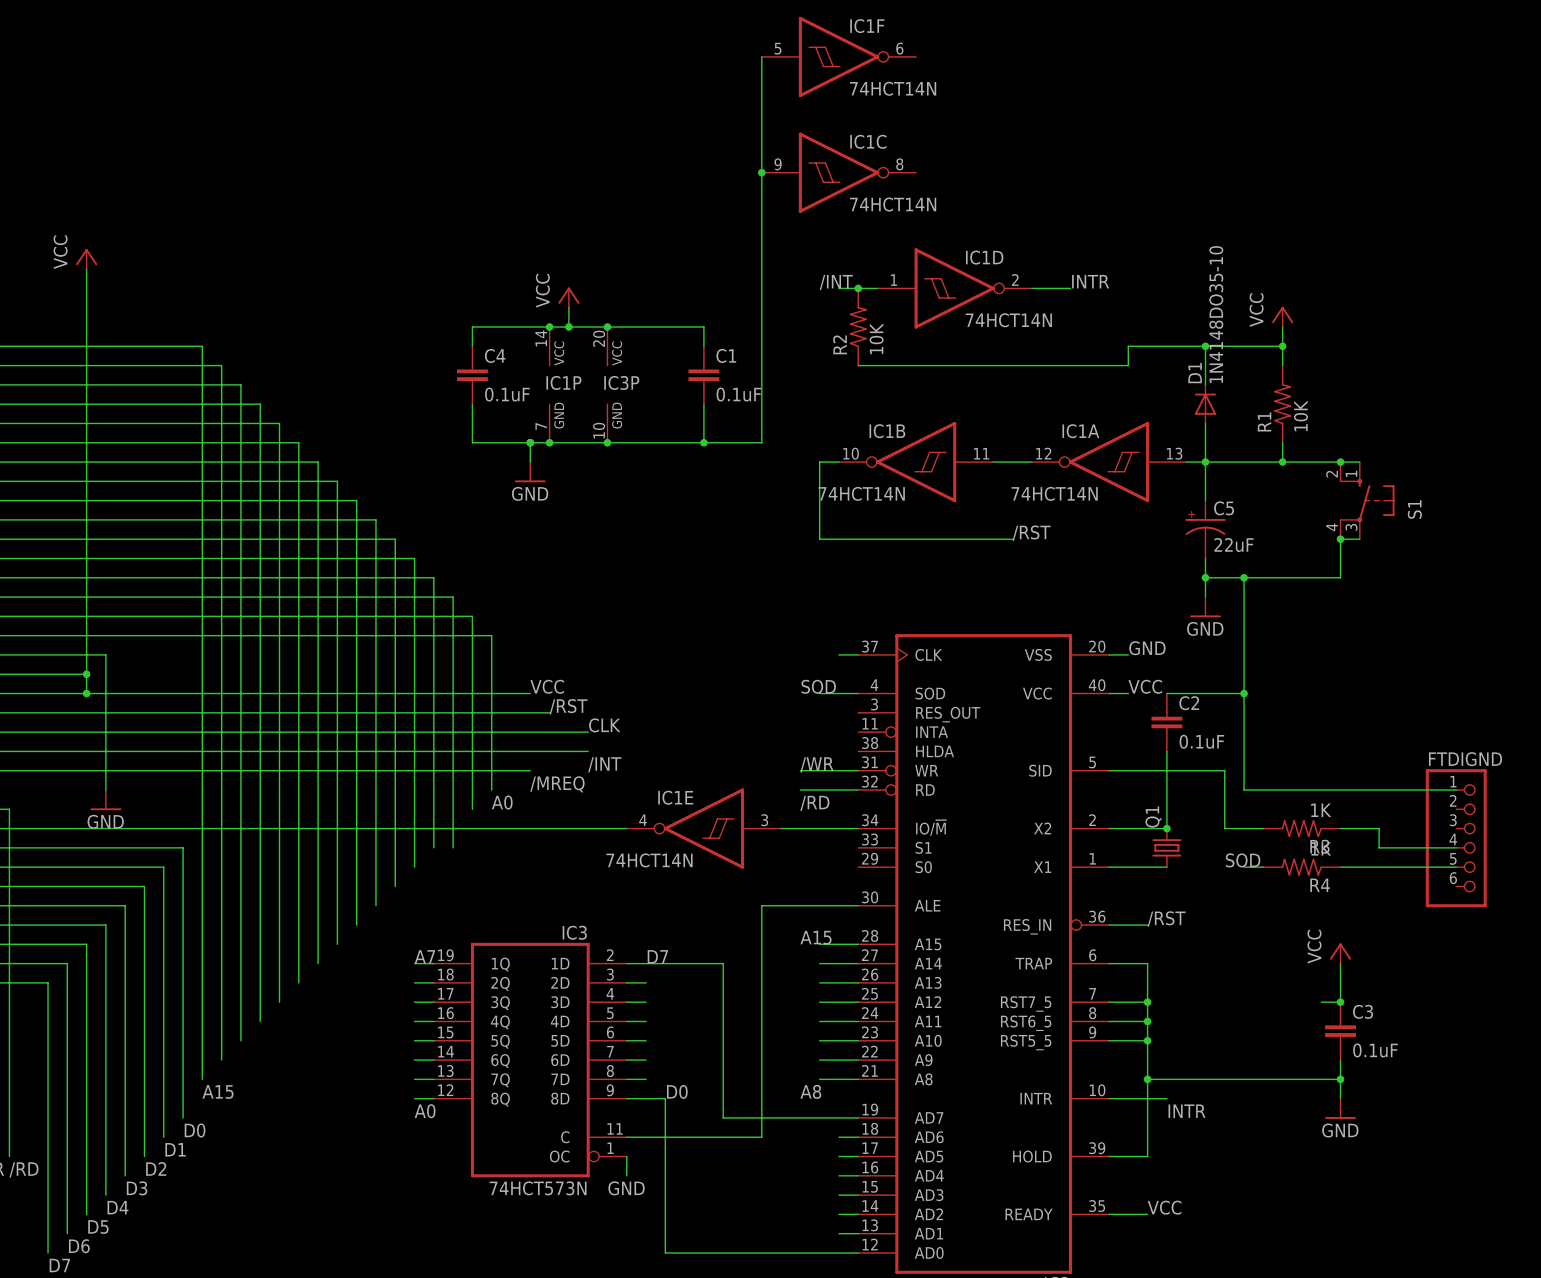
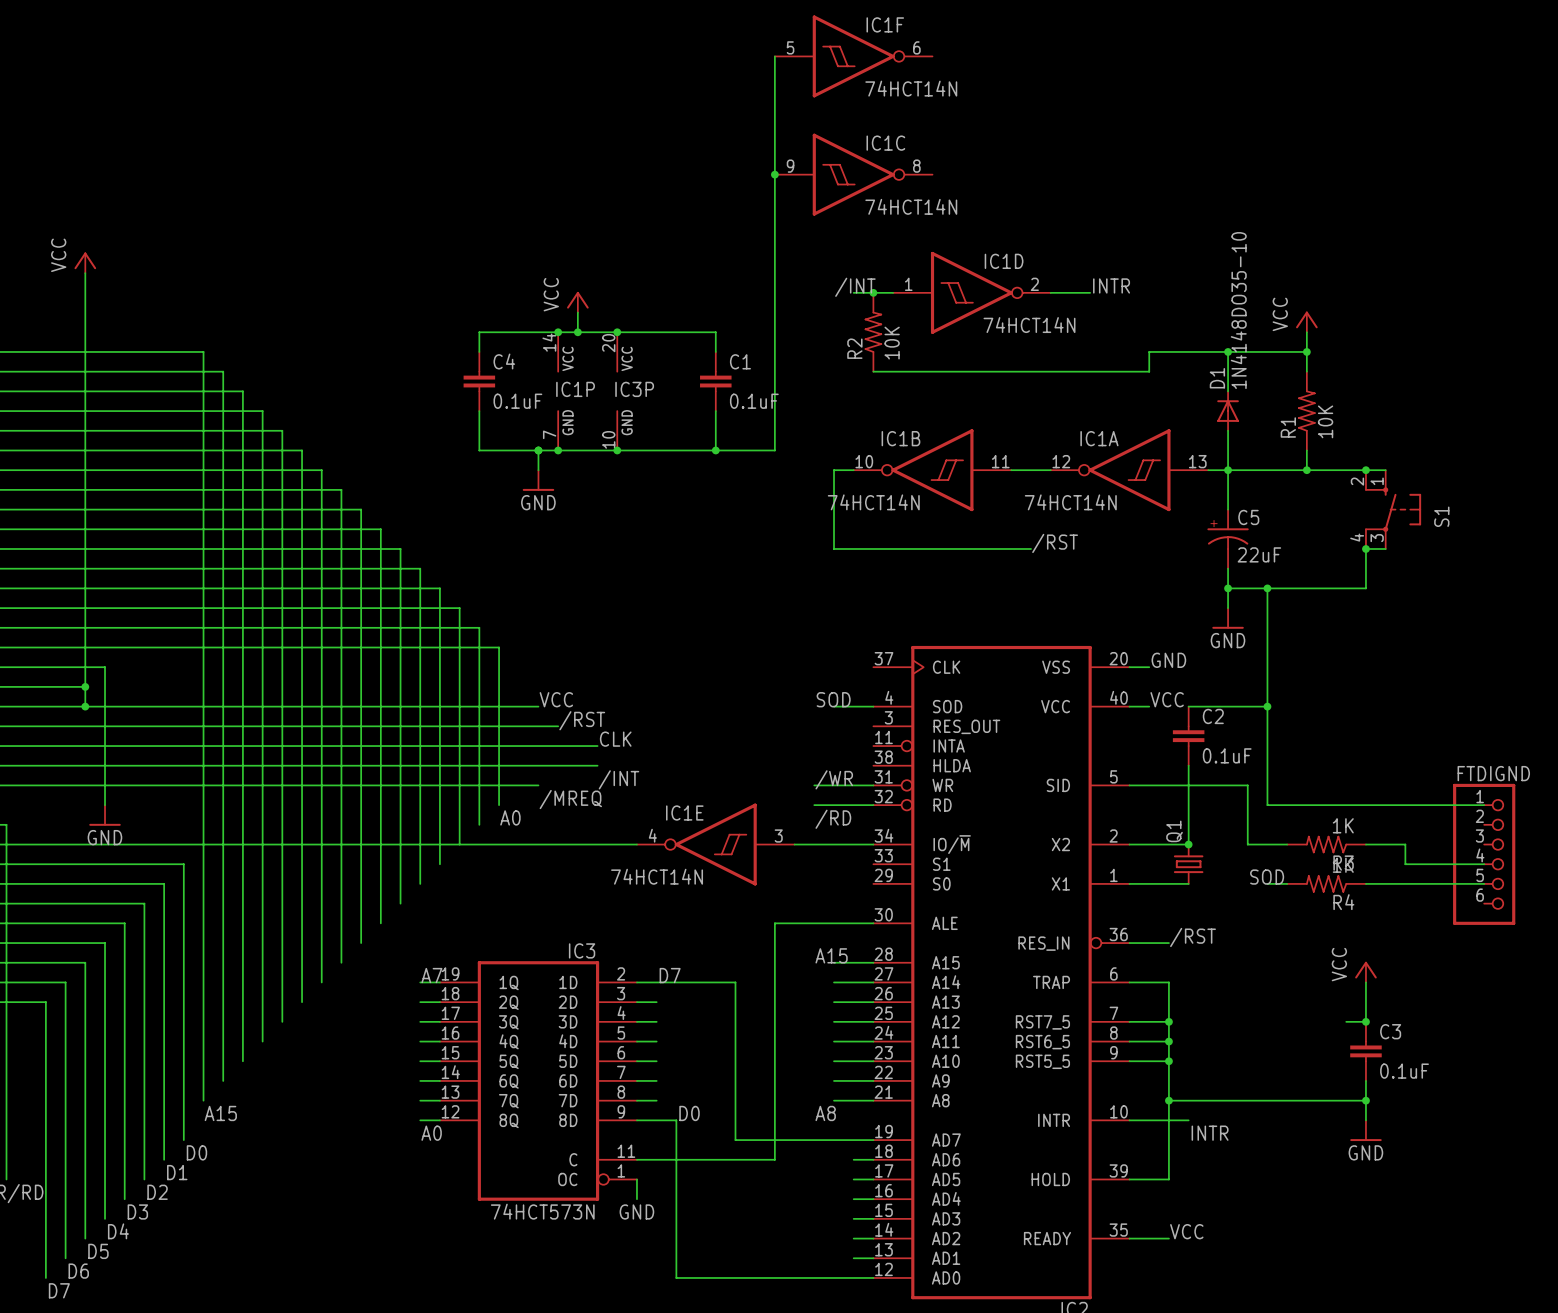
wire: (838, 654) (858, 654) -> none
wire: (453, 828) (453, 847) -> none

